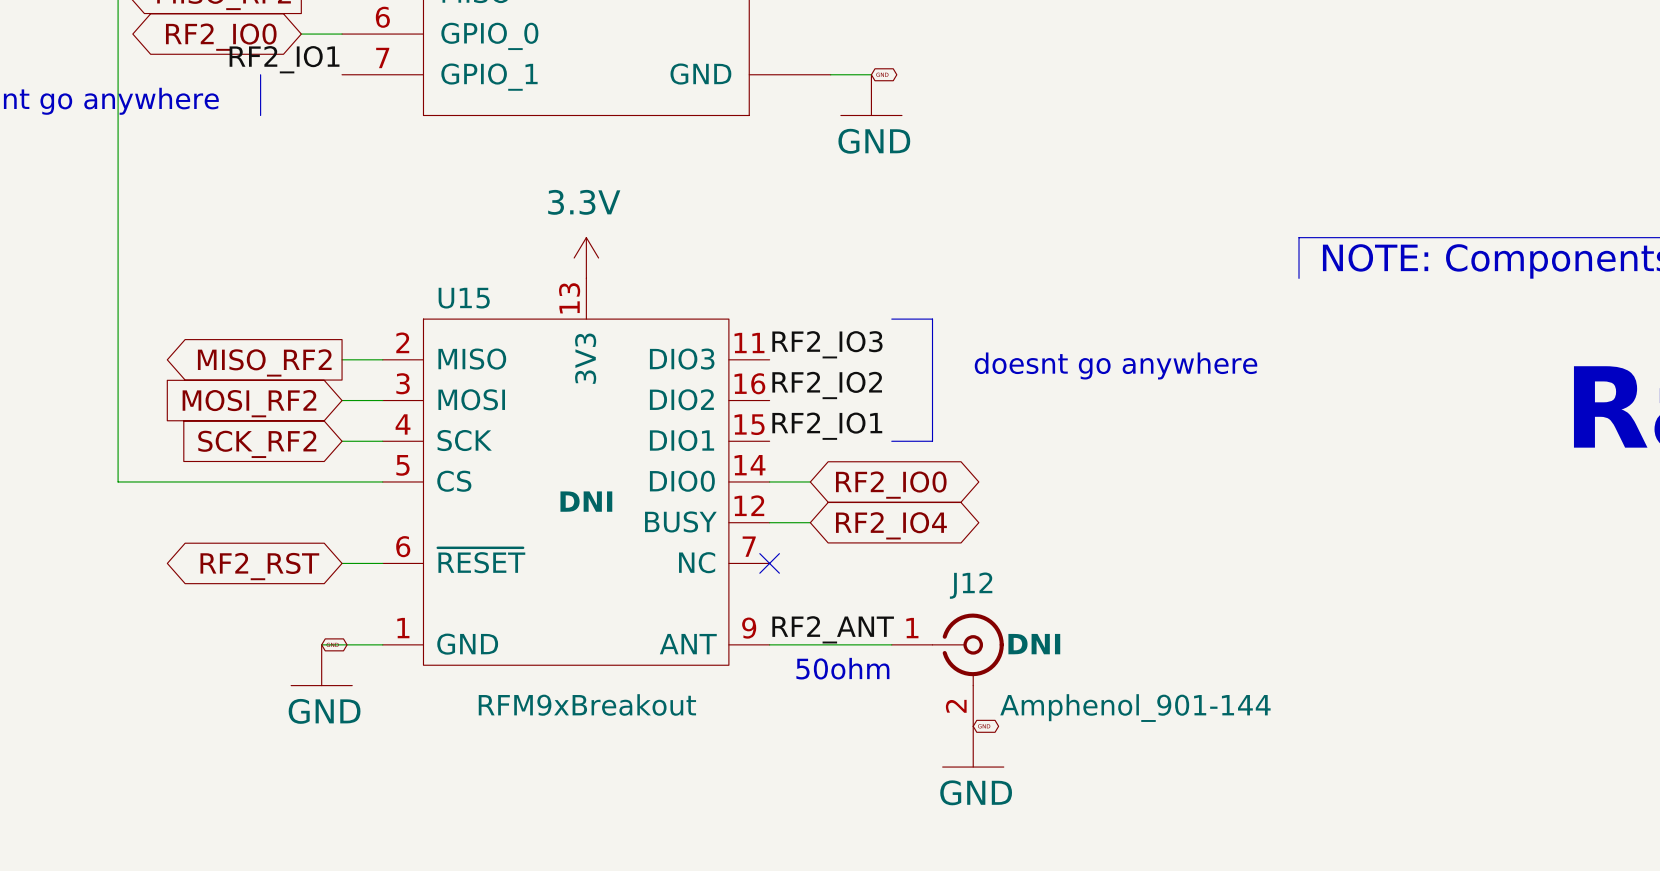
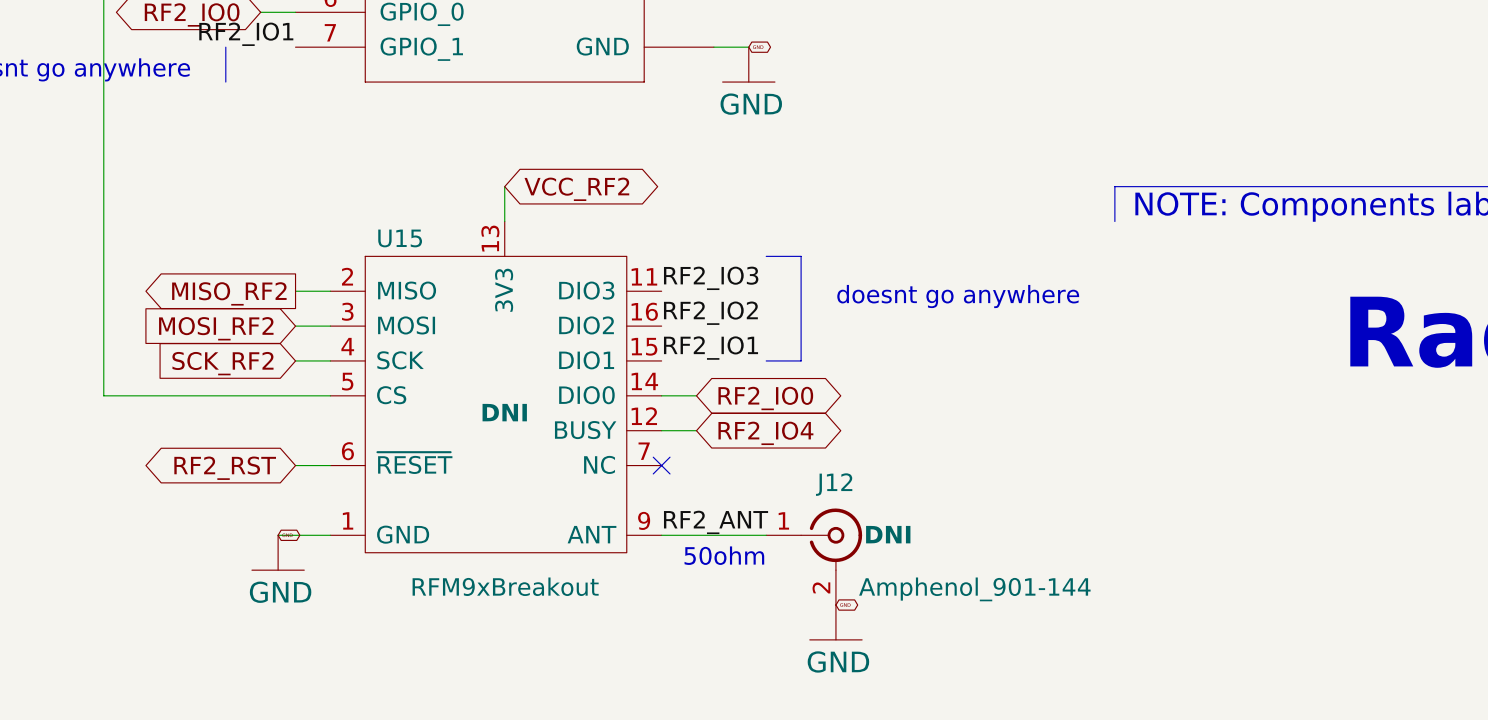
global label: none -> VCC_RF2 (576, 189)
power symbol: 3.3V (586, 258) -> none

